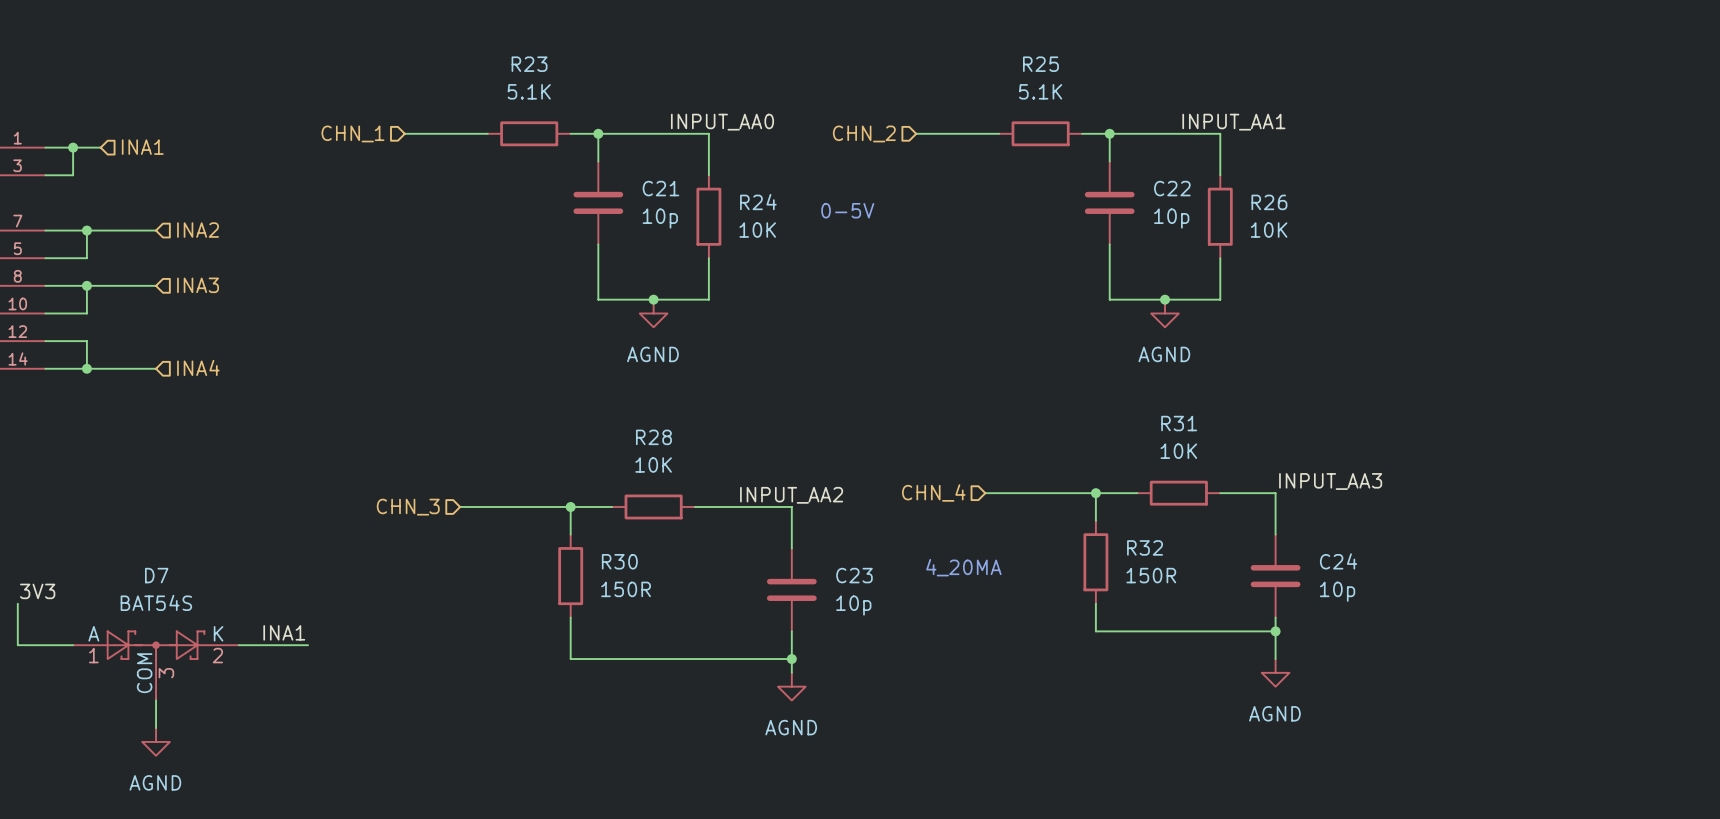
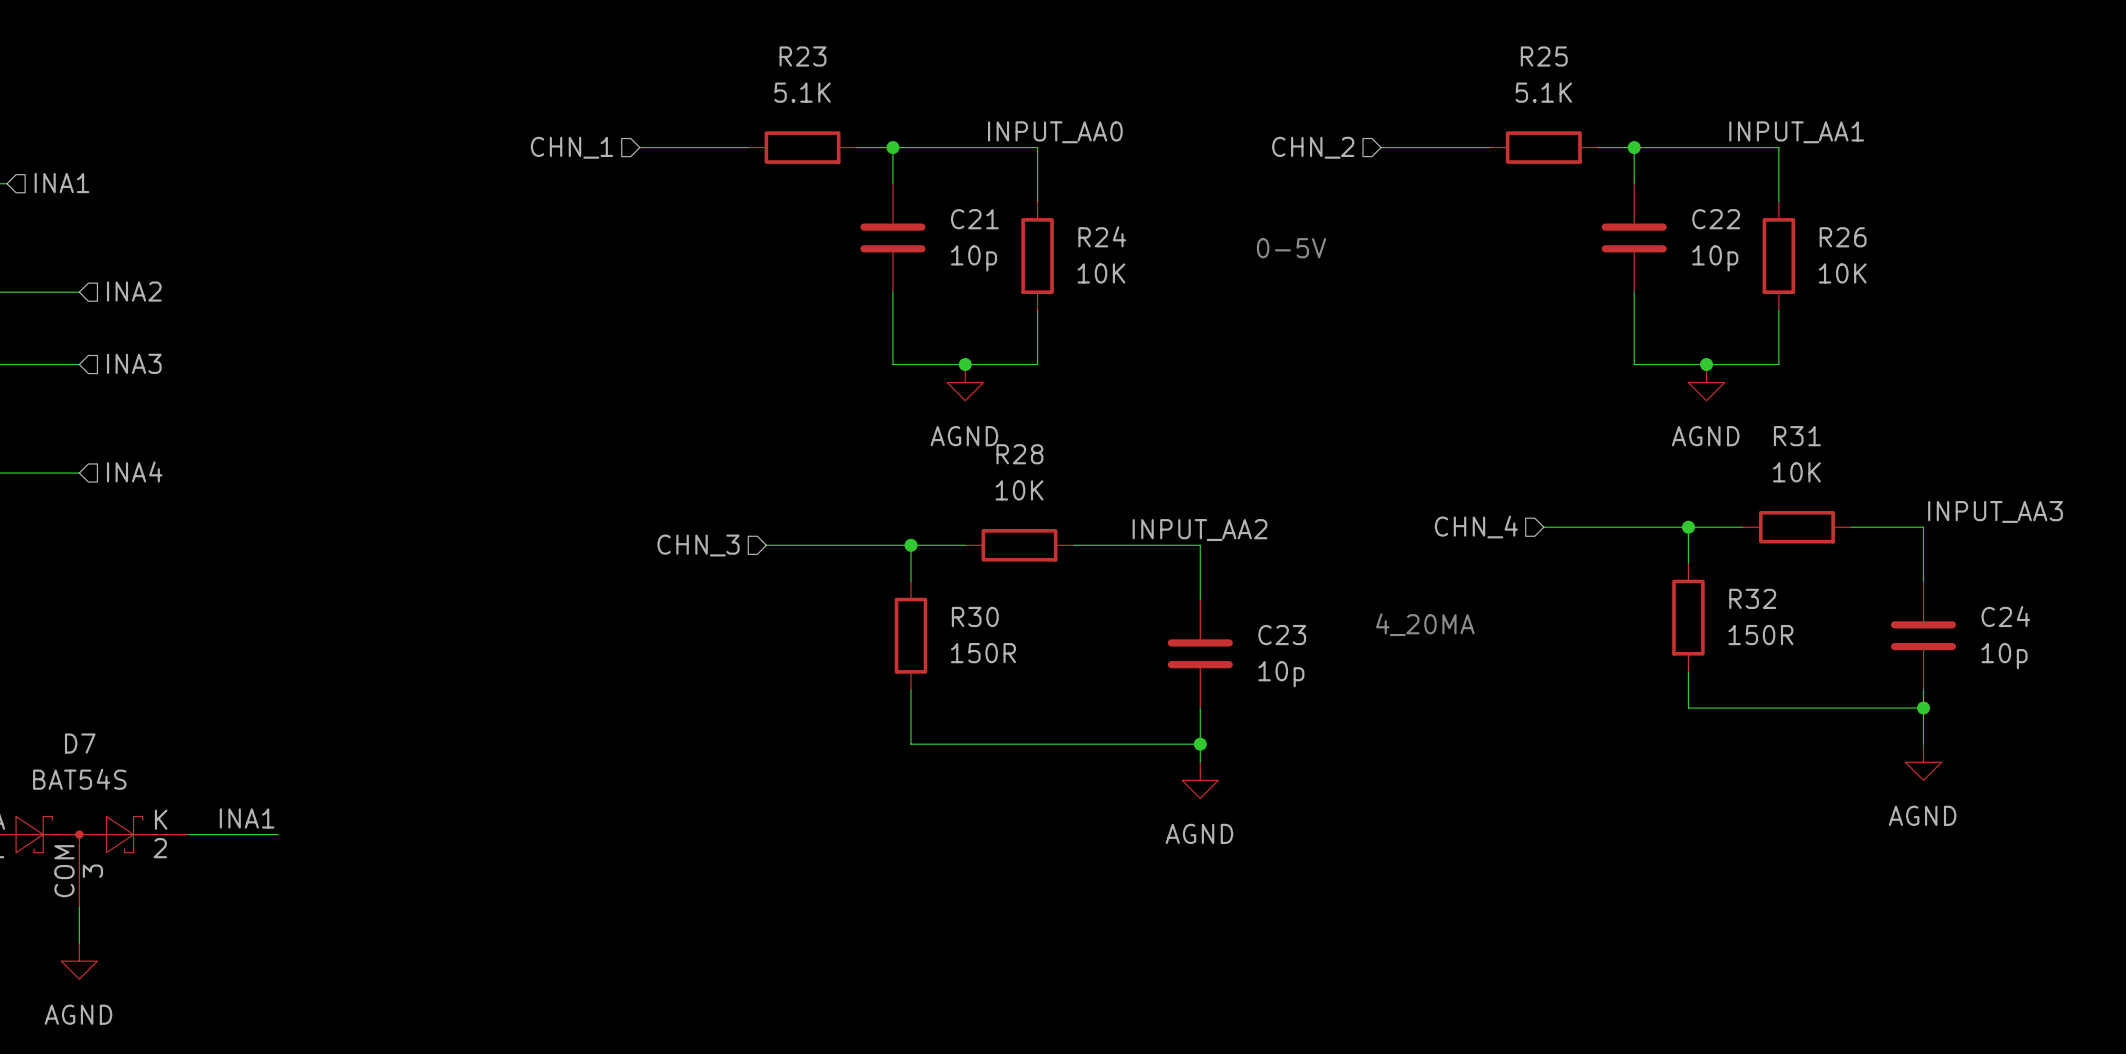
junction: none -> (892, 147)
junction: none -> (1634, 147)
label position: INPUT_AA0 (722, 122) -> INPUT_AA0 (1055, 132)
label position: INPUT_AA1 (1233, 122) -> INPUT_AA1 (1796, 132)
hierarchical label position: CHN_1 (352, 133) -> CHN_1 (571, 147)
wire: (404, 133) (487, 133) -> (639, 147) (748, 147)
R23 position: (529, 133) -> (802, 147)
wire: (570, 133) (708, 133) (708, 175) -> (856, 147) (1037, 147) (1037, 201)
wire: (598, 133) (598, 161) -> (892, 147) (892, 183)
junction: (598, 133) -> none
hierarchical label position: CHN_2 (864, 133) -> CHN_2 (1313, 147)
wire: (916, 133) (999, 133) -> (1381, 147) (1489, 147)
R25 position: (1040, 133) -> (1543, 147)
wire: (1082, 133) (1220, 133) (1220, 175) -> (1598, 147) (1778, 147) (1778, 201)
wire: (1109, 133) (1109, 161) -> (1634, 147) (1634, 183)
junction: (1109, 133) -> none
C21 position: (598, 202) -> (892, 237)
C22 position: (1109, 202) -> (1634, 237)
text position: 0-5V (847, 210) -> 0-5V (1291, 248)
R24 position: (708, 216) -> (1037, 256)
R26 position: (1220, 216) -> (1778, 256)
wire: (598, 244) (598, 299) (708, 299) (708, 258) -> (892, 292) (892, 364) (1037, 364) (1037, 310)
wire: (1109, 244) (1109, 299) (1220, 299) (1220, 258) -> (1634, 292) (1634, 364) (1778, 364) (1778, 310)
junction: none -> (965, 364)
junction: none -> (1706, 364)
junction: (653, 299) -> none
power symbol: none -> AGND (965, 382)
junction: (1165, 299) -> none
power symbol: none -> AGND (1706, 382)
power symbol: AGND (653, 313) -> none
power symbol: AGND (1165, 313) -> none
label: none -> INPUT_AA3 (1995, 511)
hierarchical label: none -> CHN_4 (1476, 526)
wire: none -> (1543, 527) (1742, 527)
wire: none -> (1688, 527) (1688, 563)
junction: none -> (1688, 527)
wire: none -> (1851, 527) (1923, 527) (1923, 581)
junction: none -> (911, 545)
wire: none -> (1073, 545) (1200, 545) (1200, 599)
label: INPUT_AA3 (1330, 481) -> none
hierarchical label: CHN_4 (933, 492) -> none
wire: (985, 493) (1137, 493) -> none
wire: (1095, 493) (1095, 520) -> none
junction: (1095, 493) -> none
R31 position: (1178, 493) -> (1796, 527)
wire: (1220, 493) (1275, 493) (1275, 534) -> none
label position: INPUT_AA2 (791, 495) -> INPUT_AA2 (1200, 530)
wire: (460, 506) (612, 506) -> (766, 545) (965, 545)
wire: (570, 506) (570, 534) -> (911, 545) (911, 581)
junction: (570, 506) -> none
R28 position: (653, 506) -> (1019, 545)
wire: (695, 506) (791, 506) (791, 534) -> none
hierarchical label position: CHN_3 (408, 507) -> CHN_3 (698, 545)
wire: none -> (1688, 671) (1688, 708) (1923, 708)
wire: none -> (1923, 689) (1923, 744)
wire: none -> (911, 708) (911, 744) (1200, 744)
junction: none -> (1923, 708)
R32 position: (1095, 562) -> (1688, 617)
text position: 4_20MA (963, 567) -> 4_20MA (1425, 624)
R30 position: (570, 576) -> (911, 635)
junction: none -> (1200, 744)
C24 position: (1275, 576) -> (1923, 635)
C23 position: (791, 589) -> (1200, 653)
power symbol: none -> AGND (1923, 762)
power symbol: none -> AGND (1200, 780)
wire: (1095, 603) (1095, 631) (1275, 631) -> none
wire: (570, 617) (570, 659) (791, 659) -> none
wire: (1275, 617) (1275, 659) -> none
wire: (791, 631) (791, 672) -> (1200, 708) (1200, 762)
junction: (1275, 631) -> none
junction: (791, 659) -> none
power symbol: AGND (1275, 672) -> none
power symbol: AGND (791, 686) -> none

